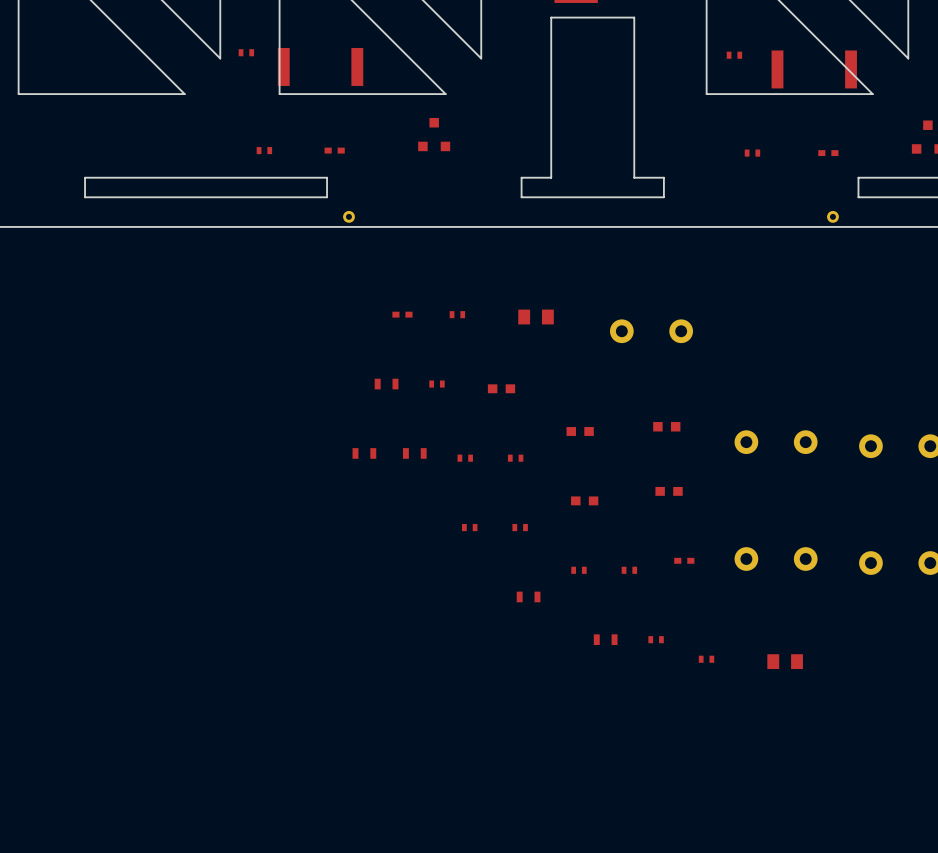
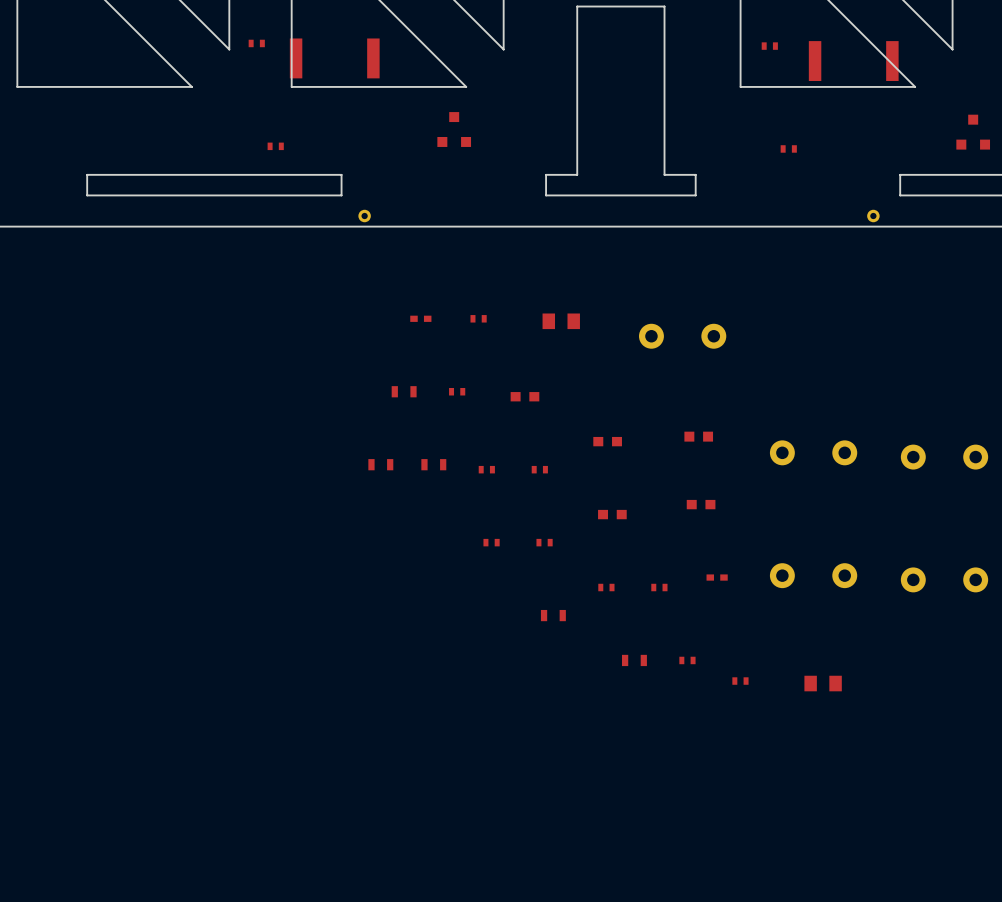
part: (334, 150) -> none
part: (828, 153) -> none

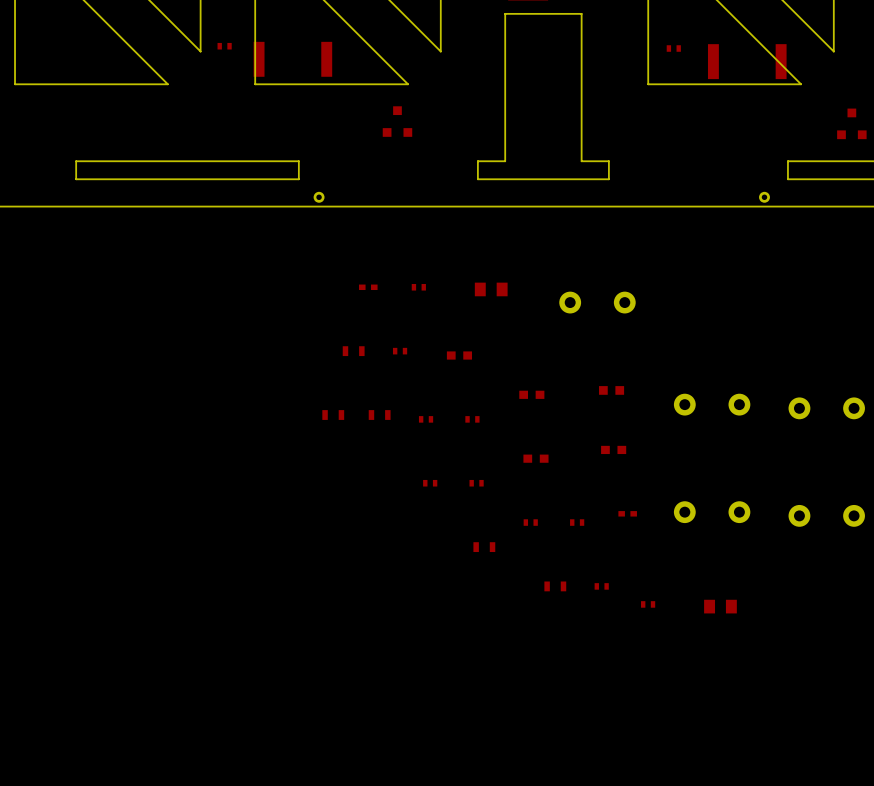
part: (275, 146) -> none
part: (788, 148) -> none

